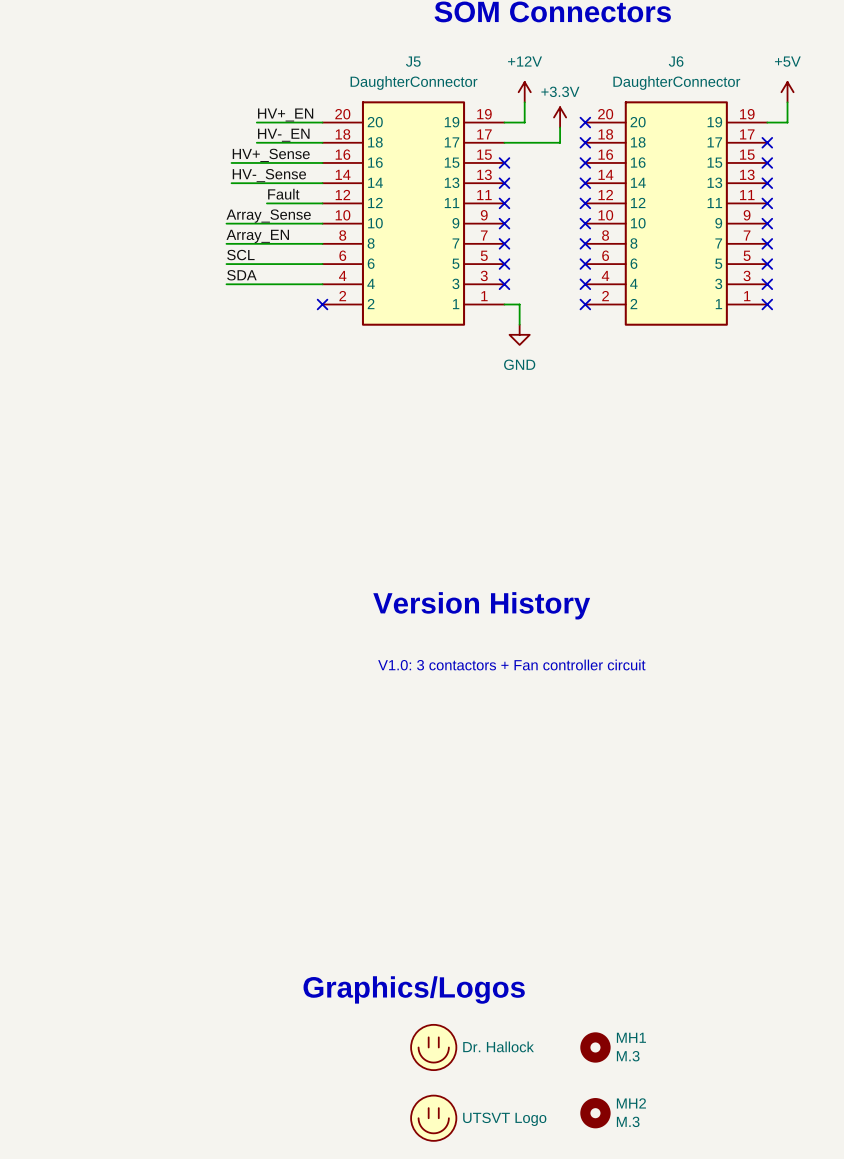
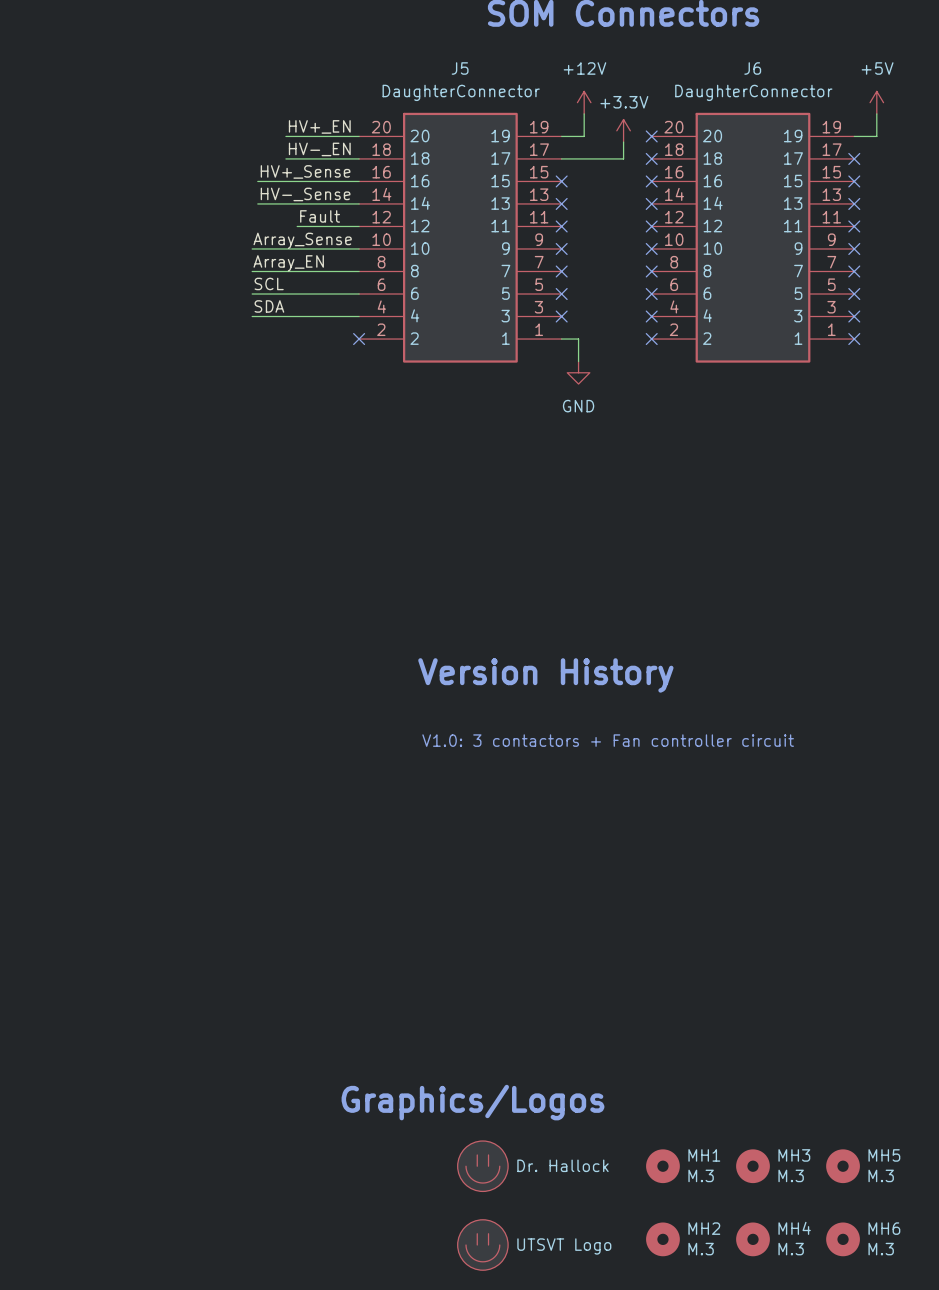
MH3: none -> M.3 (753, 1166)
MH5: none -> M.3 (843, 1166)
MH4: none -> M.3 (753, 1239)
MH6: none -> M.3 (843, 1239)

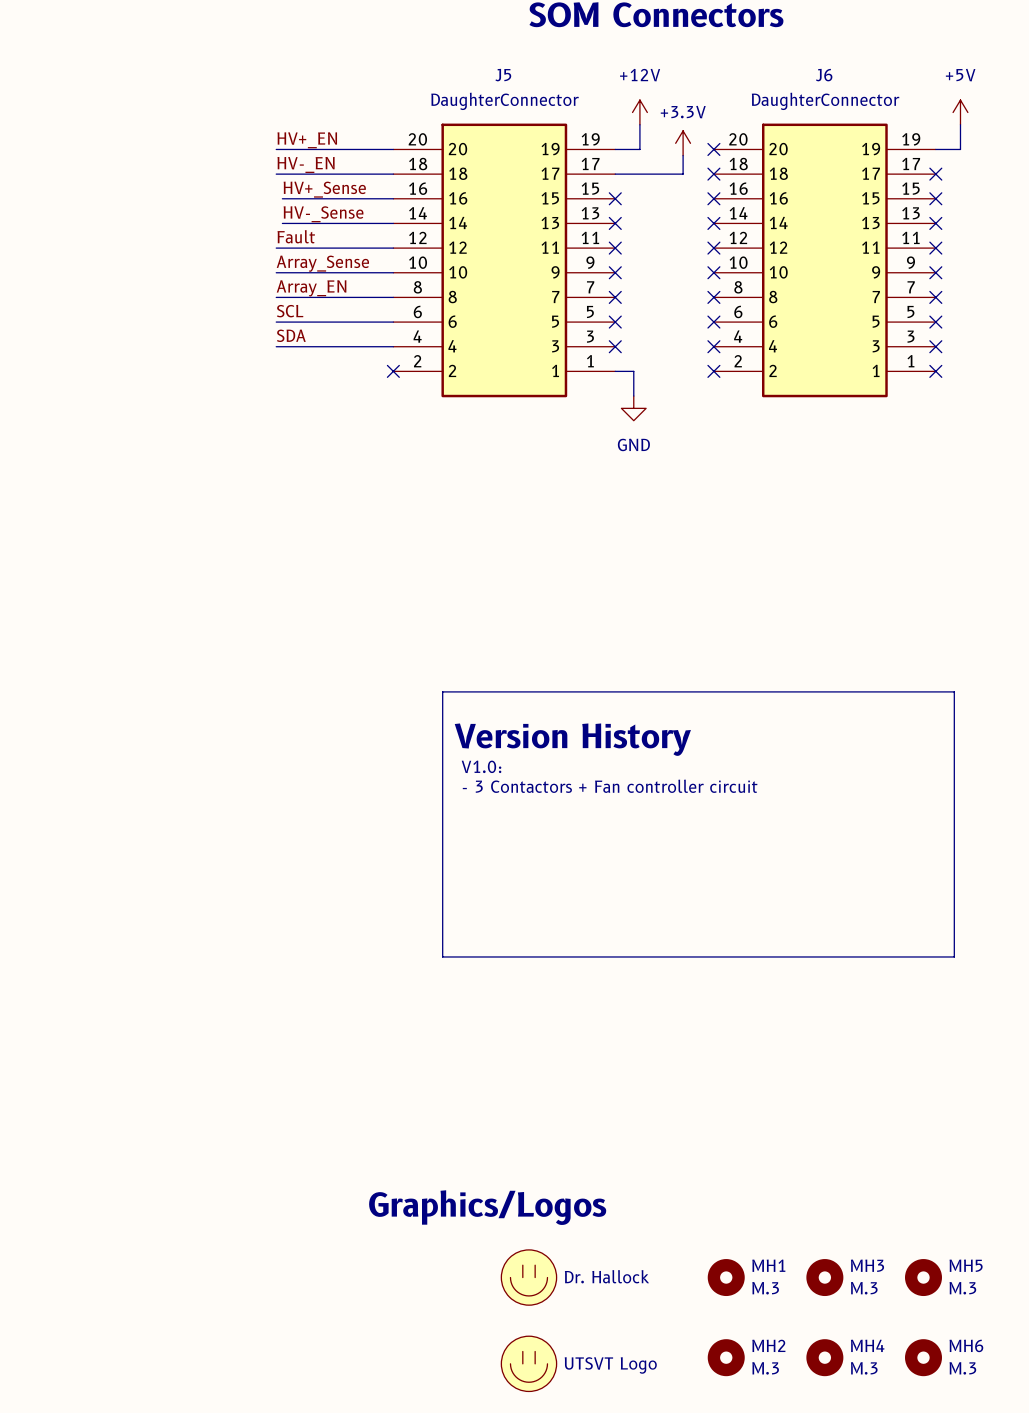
label position: HV+_EN (319, 126) -> HV+_EN (307, 140)
wire: none -> (276, 149) (313, 149)
label position: HV-_EN (319, 149) -> HV-_EN (306, 164)
wire: none -> (276, 174) (313, 174)
label position: Fault (320, 216) -> Fault (296, 236)
wire: none -> (276, 248) (325, 248)
line: none -> (442, 691) (954, 691) (954, 956) (442, 956) (442, 691)
text: none -> V1.0: (481, 766)
text: V1.0: 3 contactors + Fan controller circuit (608, 740) -> - 3 Contactors + Fan controller circuit (610, 786)

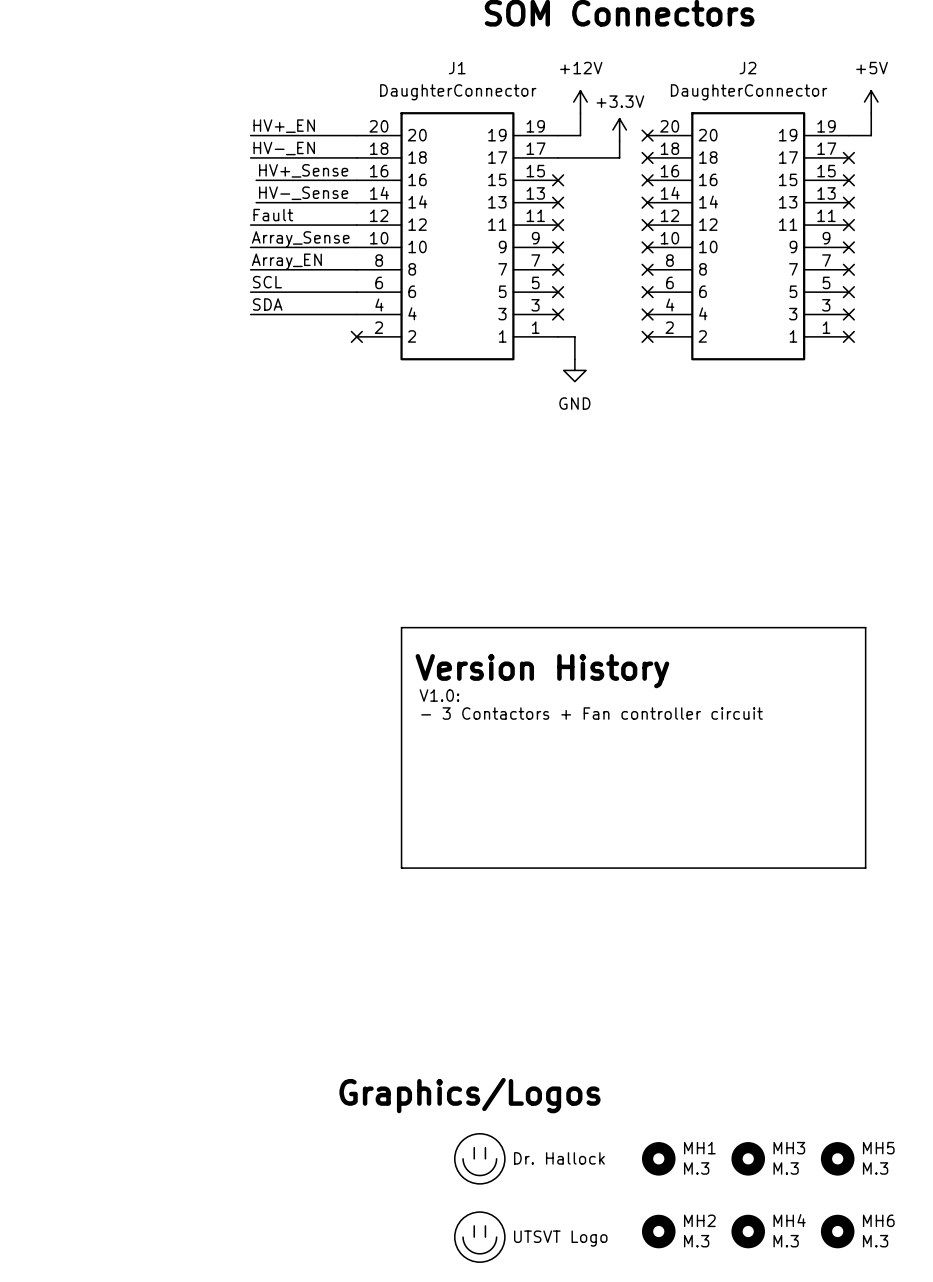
J5 name: J5 (503, 75) -> J1 (457, 68)
J6 name: J6 (824, 75) -> J2 (747, 68)

